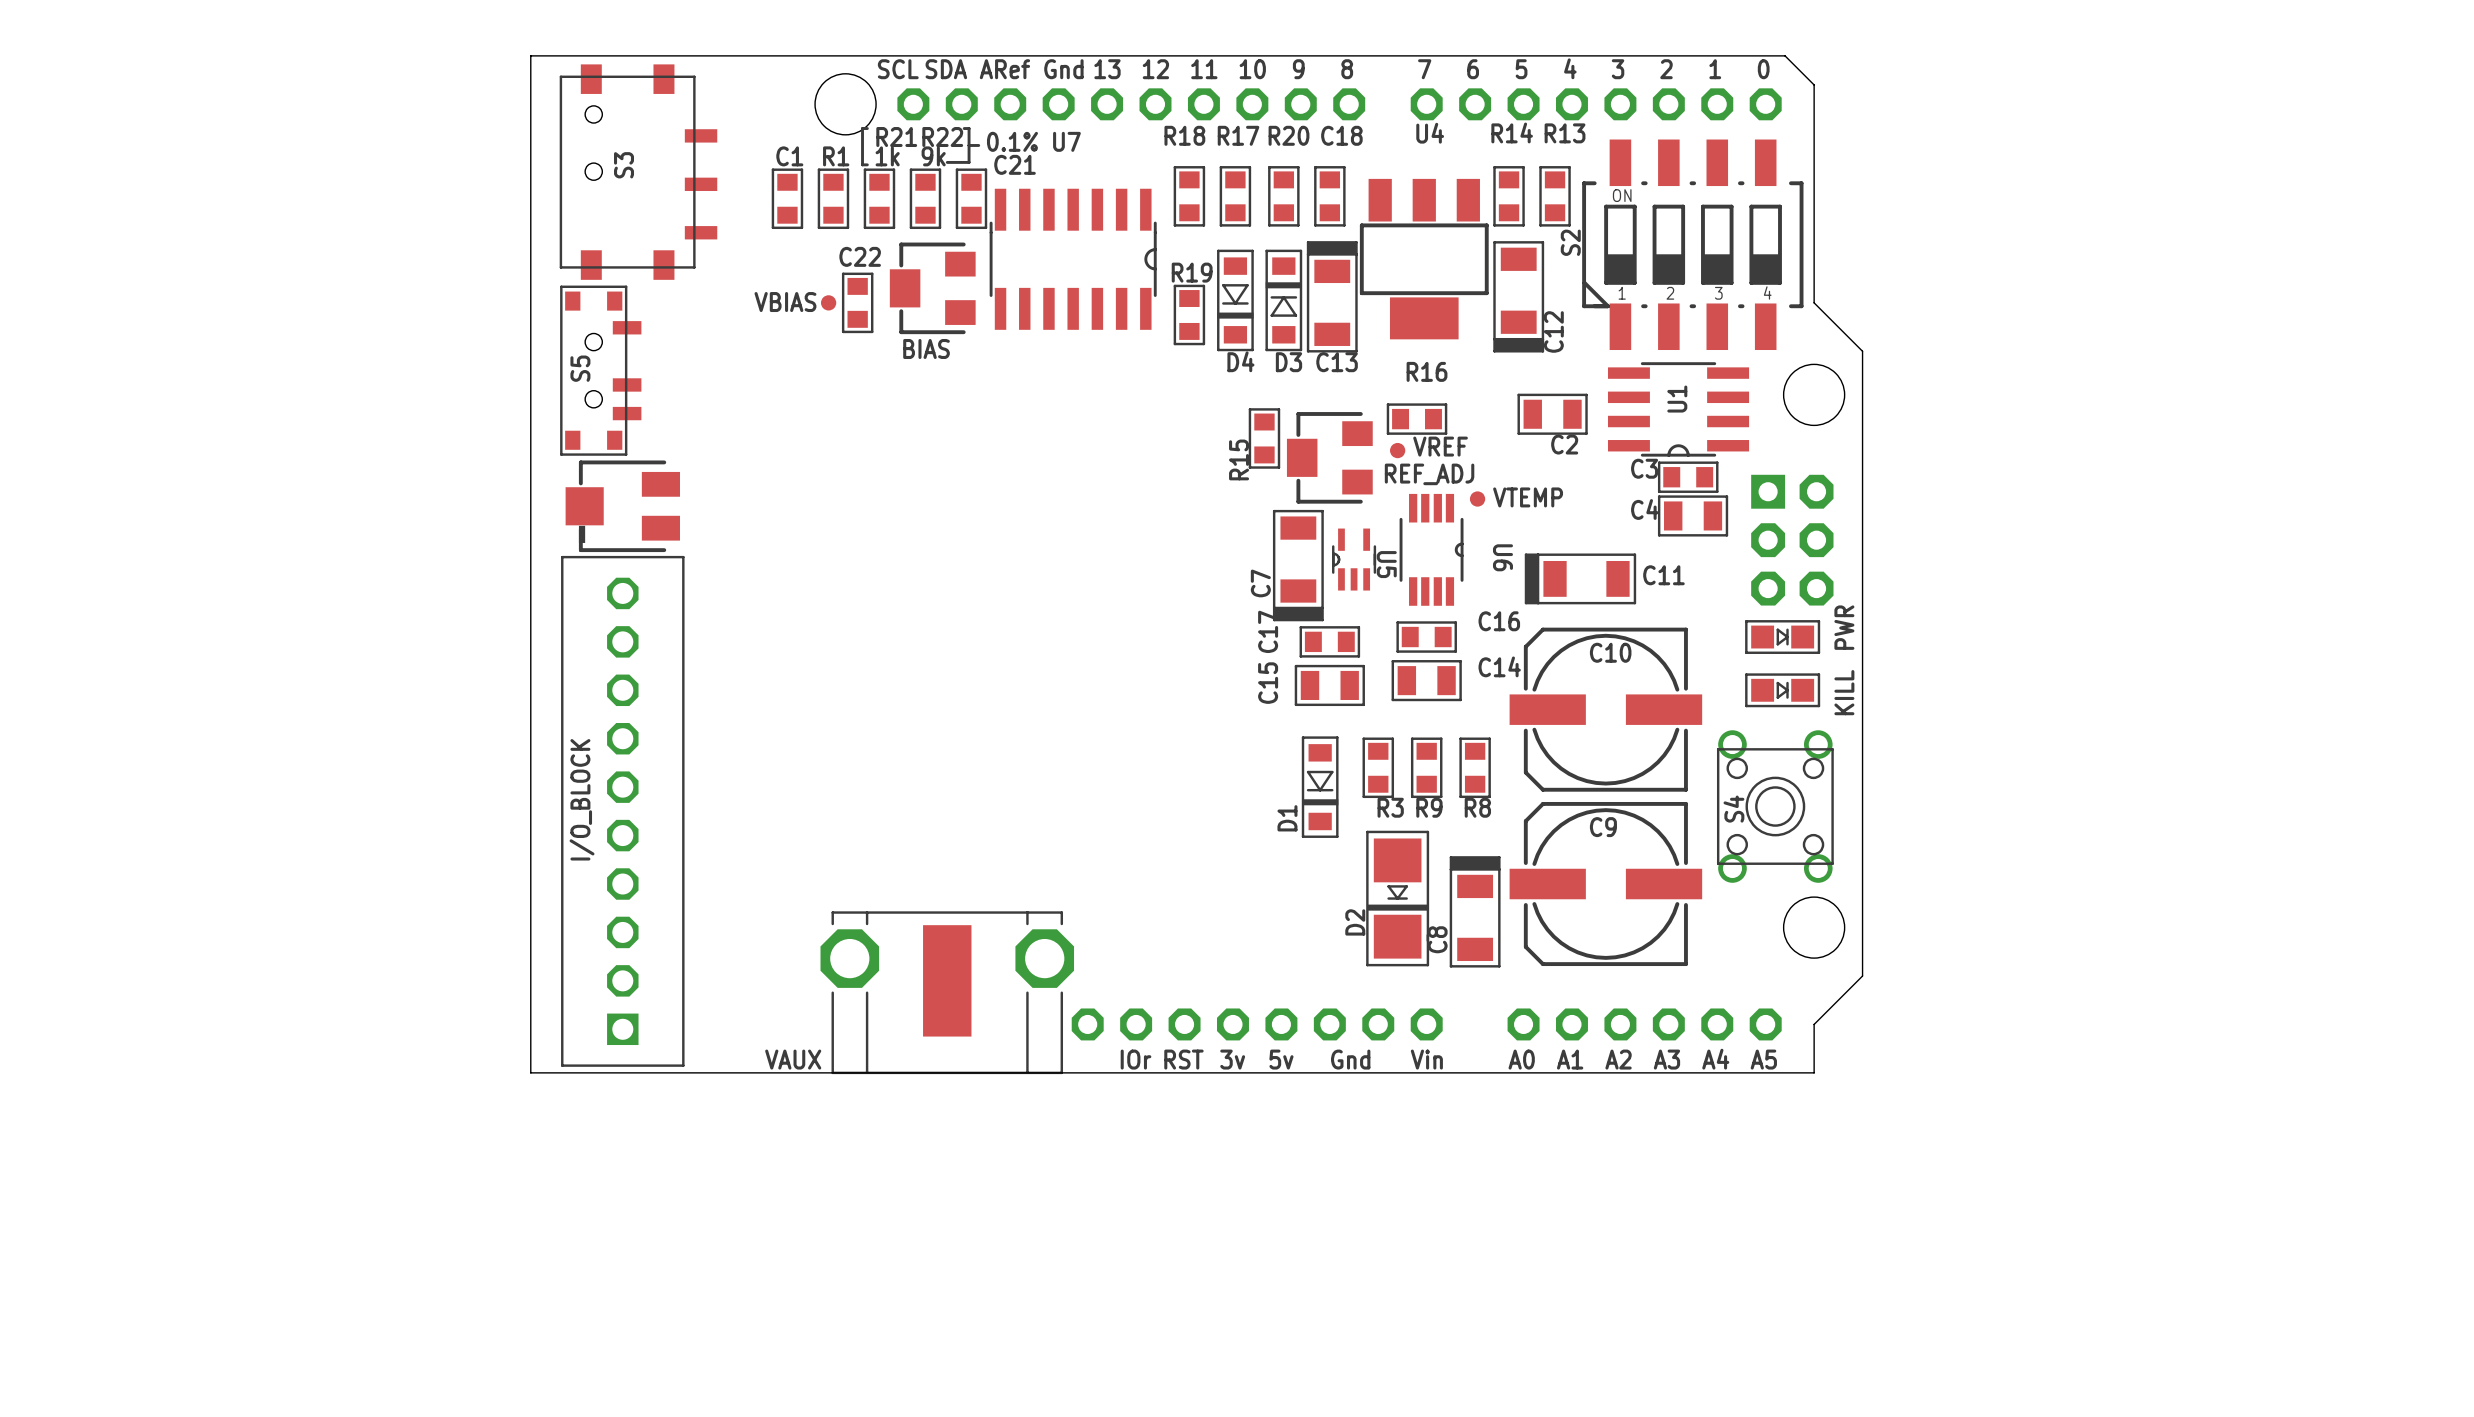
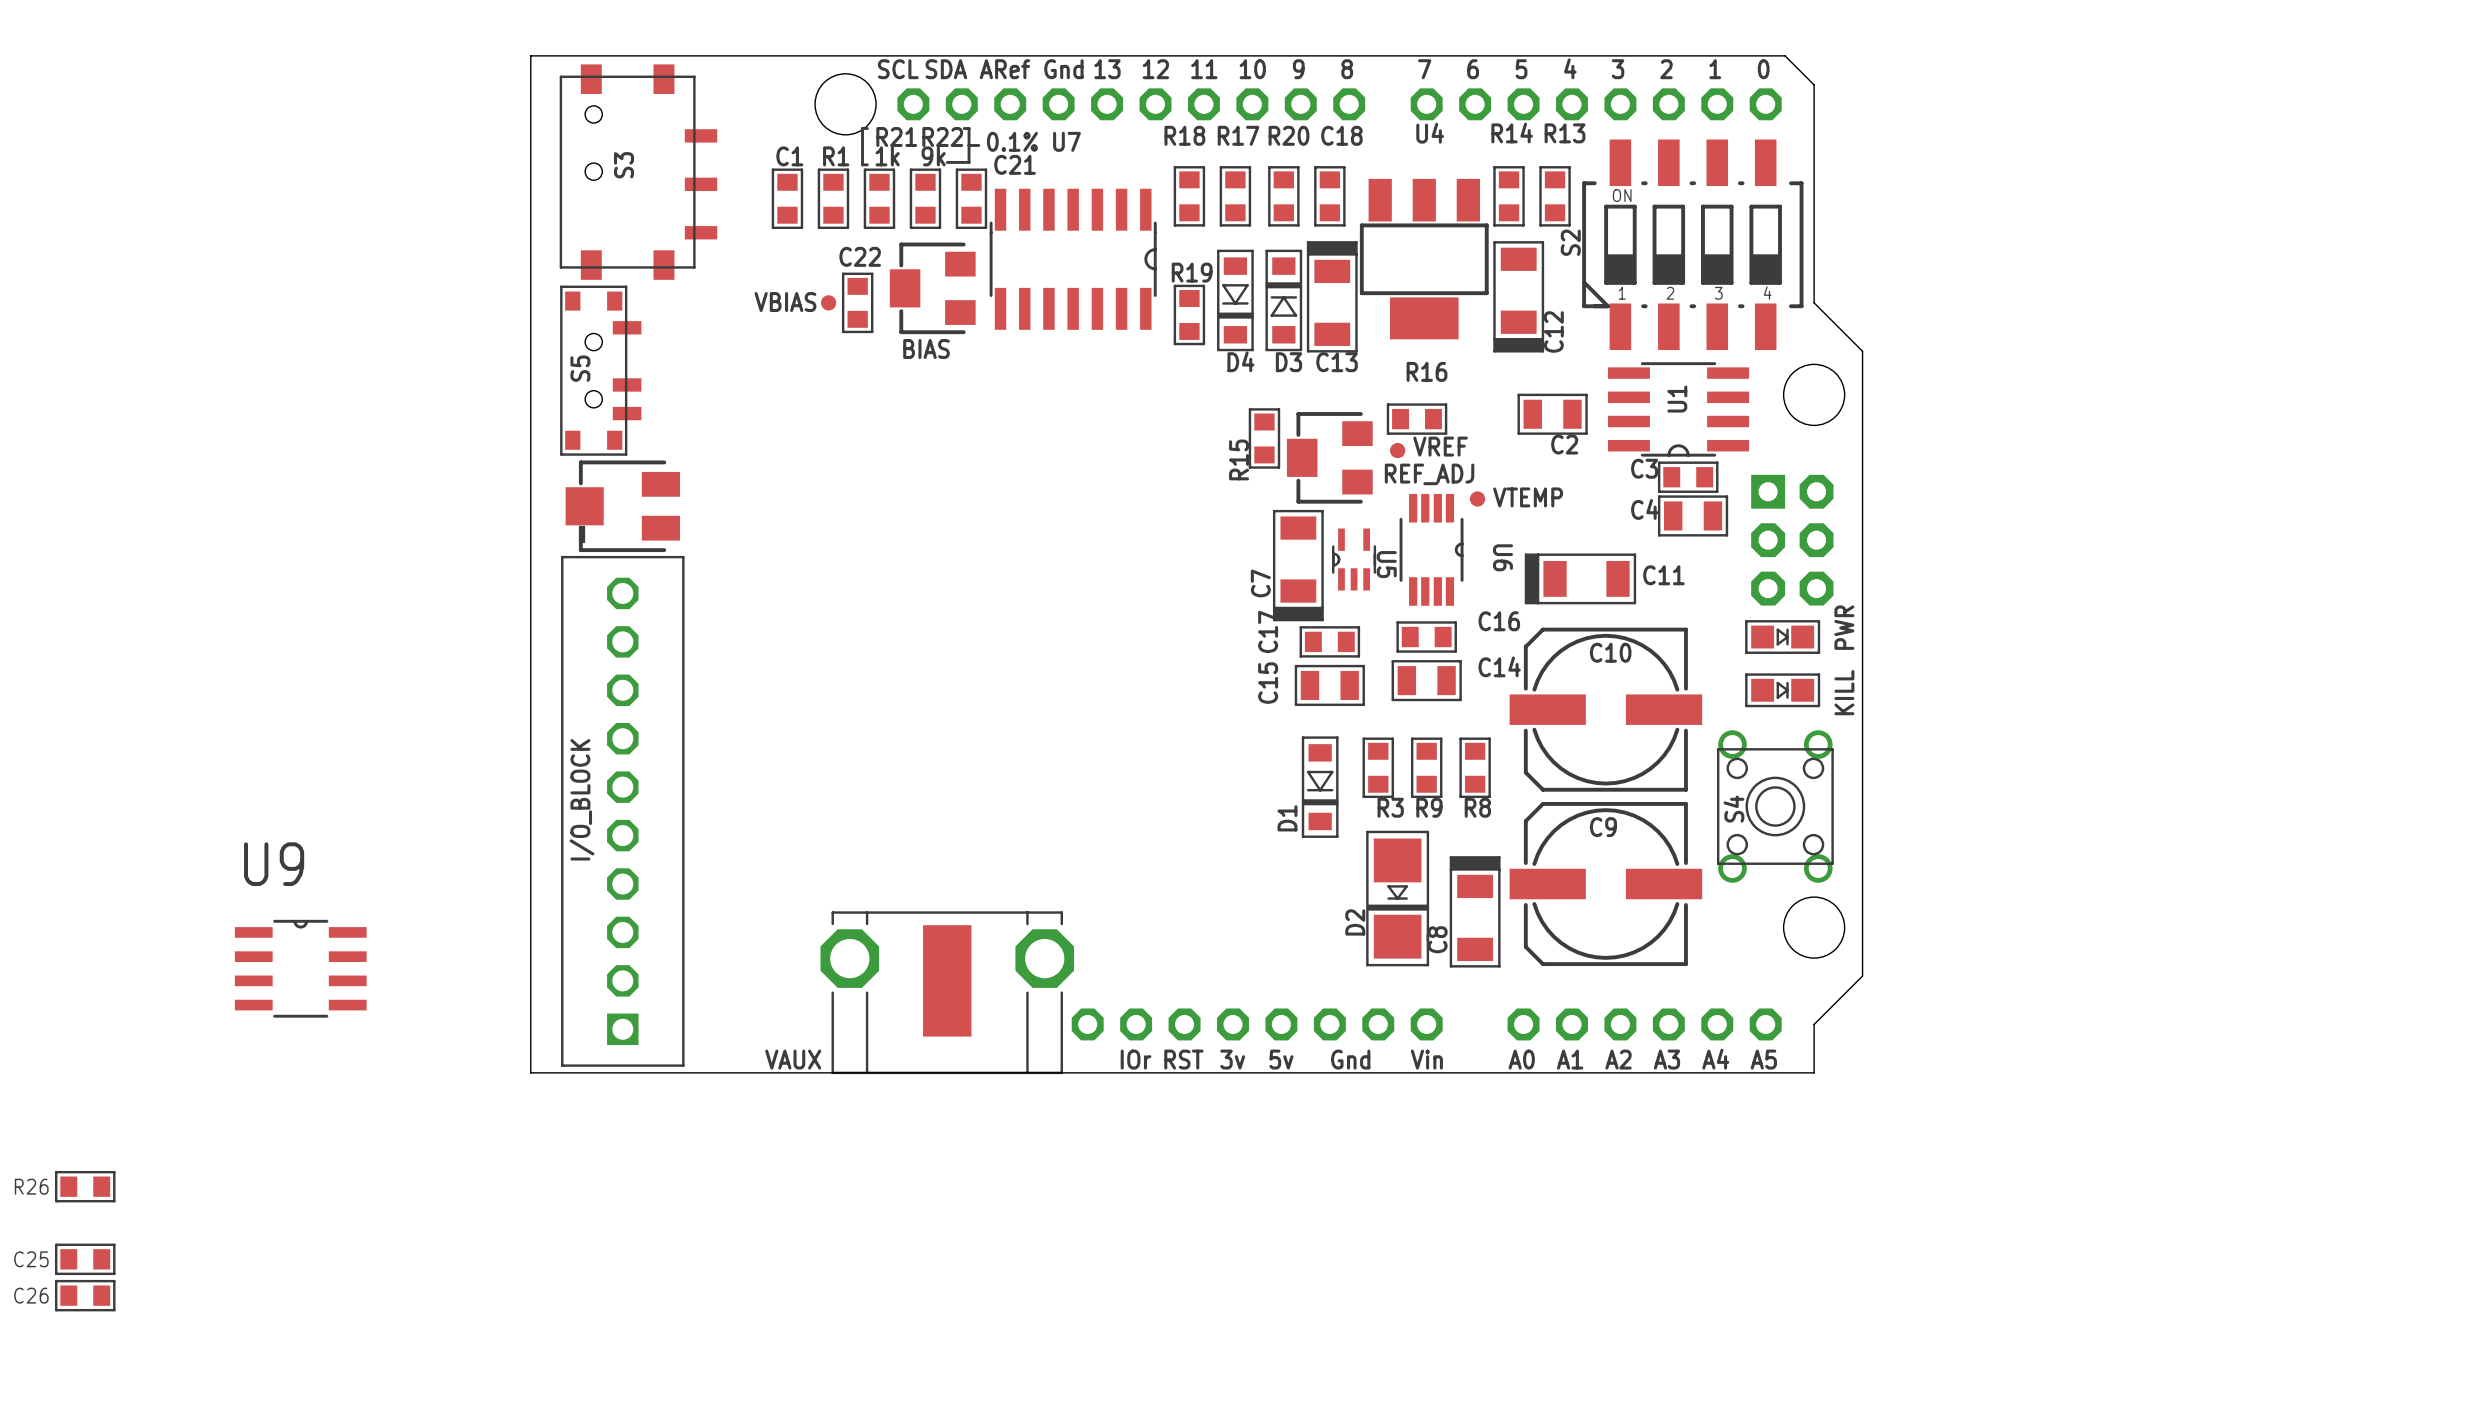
U9: none -> (300, 968)
R26: none -> (85, 1186)
C25: none -> (85, 1259)
C26: none -> (85, 1295)

